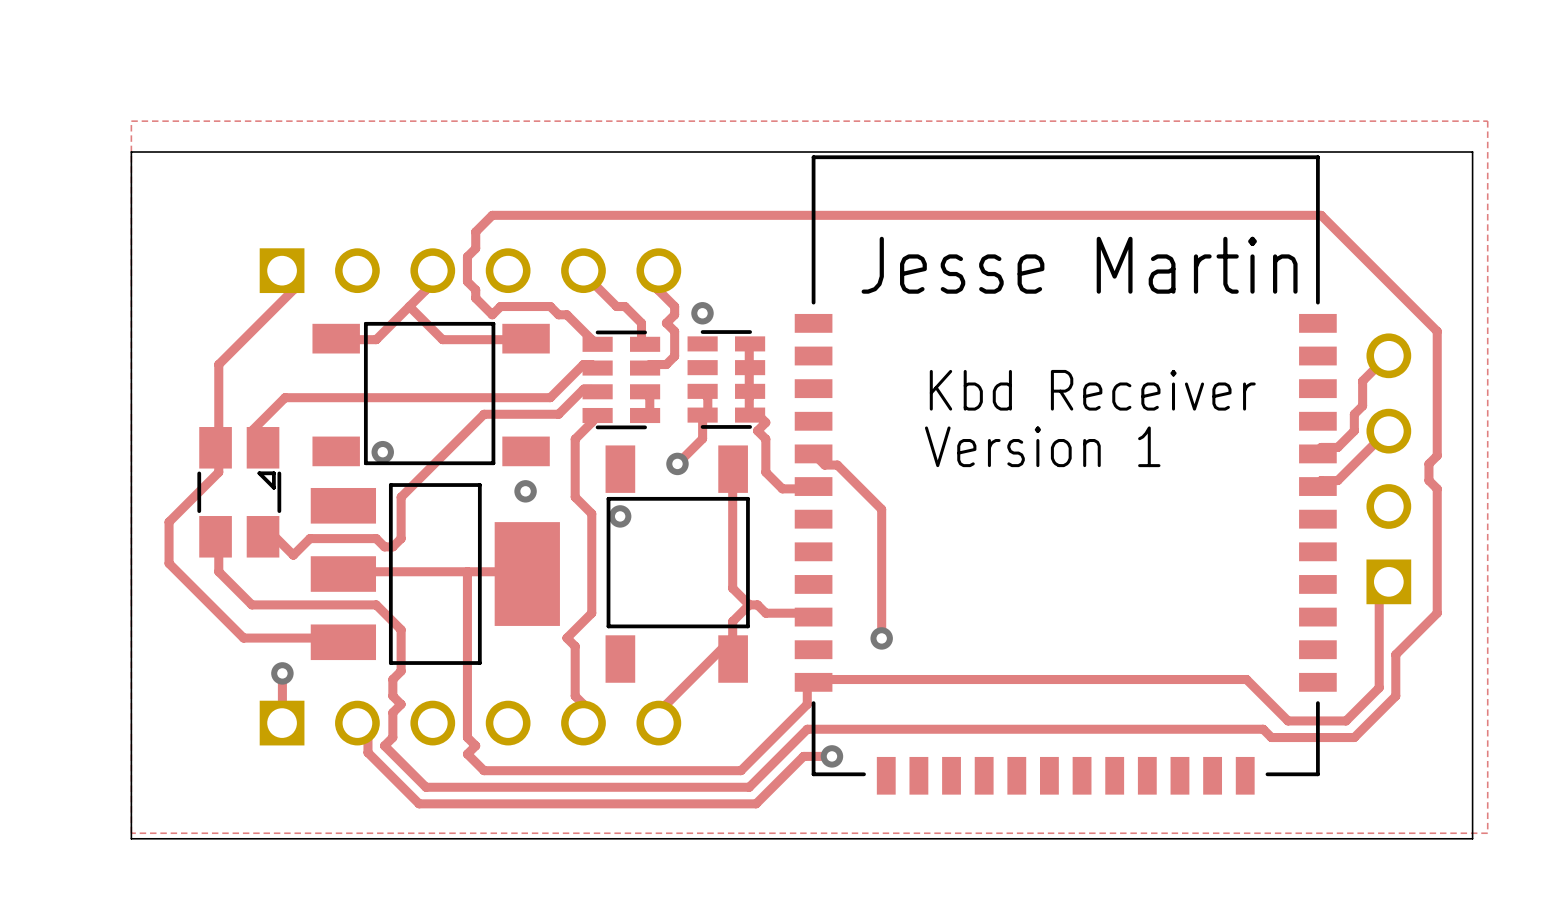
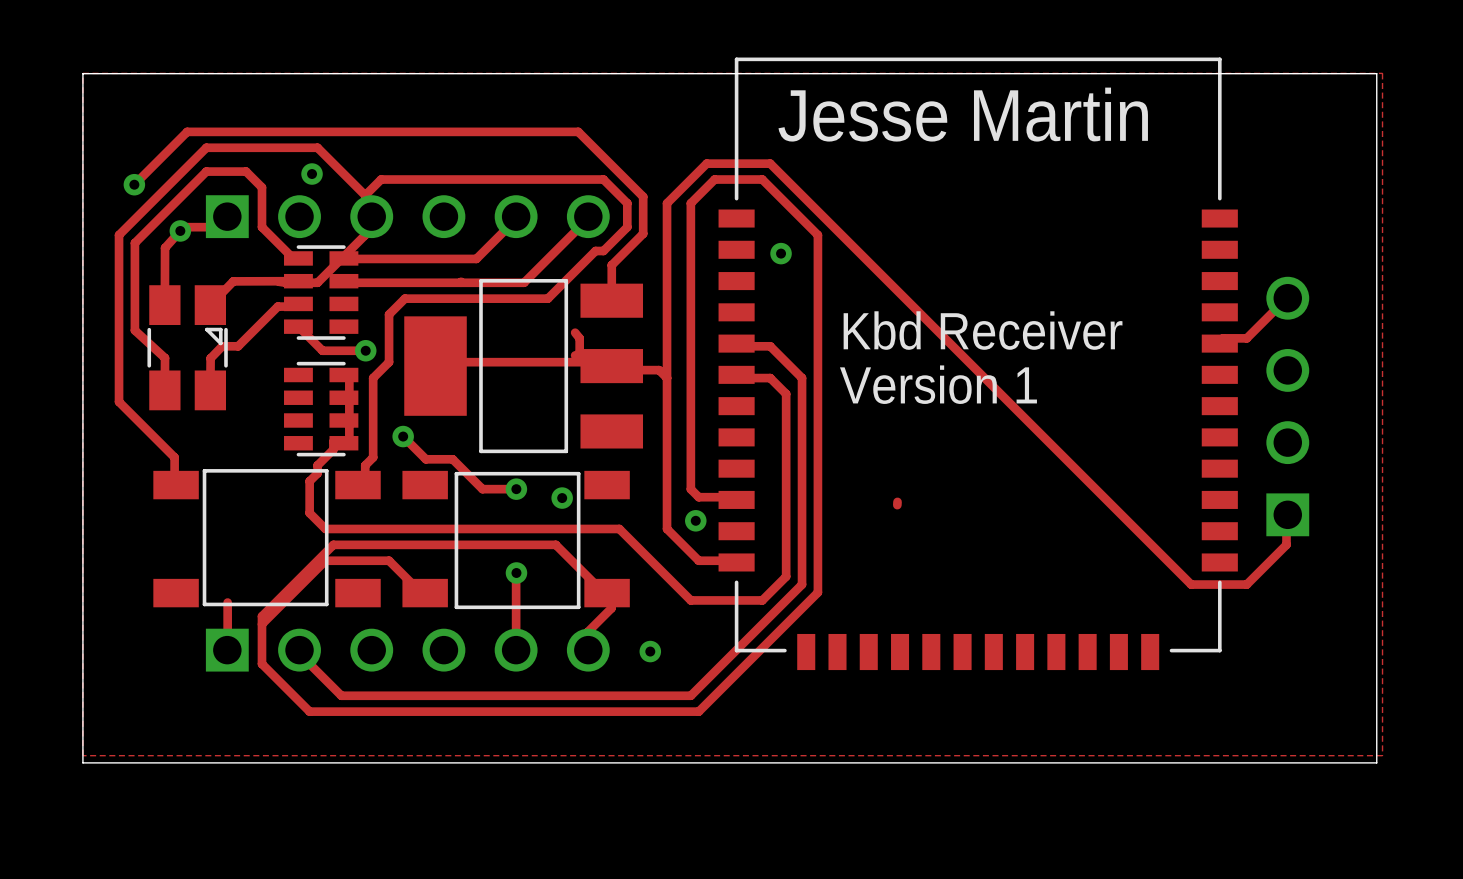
board edge: (131, 152) (1472, 152) (1472, 838) (131, 838) -> (82, 102) (82, 73) (1376, 73) (1376, 762) (82, 762) (82, 760)
track: (782, 215) (492, 215) (475, 231) (475, 248) (467, 256) (467, 281) (475, 289) (475, 298) (492, 314) (500, 306) (550, 306) (558, 314) (566, 314) (597, 344) -> none
track: (848, 215) (1321, 215) (1437, 331) (1437, 455) (1428, 464) (1428, 480) (1437, 488) (1437, 613) (1395, 654) (1395, 696) (1354, 737) (1271, 737) (1263, 729) (807, 729) -> (736, 343) (738, 346) (770, 346) (802, 378) (802, 584) (730, 656)
track: none -> (770, 163) (1191, 584) (1246, 584) (1286, 544) (1286, 513) (1288, 510)
via: none -> (312, 174)
track: none -> (134, 184) (187, 131) (578, 131) (643, 196) (643, 233) (611, 265) (611, 300)
via: none -> (134, 184)
text position: Jesse Martin (1079, 265) -> Jesse Martin (963, 114)
track: (282, 270) (293, 281) (293, 289) (218, 364) (218, 447) (215, 447) (218, 455) (218, 472) (169, 522) (169, 563) (243, 638) (343, 638) (343, 642) -> (227, 216) (214, 227) (182, 227) (165, 247) (164, 305)
track: (583, 273) (616, 306) (624, 306) (641, 323) (641, 339) (645, 344) -> (516, 219) (476, 258) (343, 258)
track: (658, 273) (658, 289) (674, 306) (674, 314) (666, 323) (674, 331) (674, 356) (666, 364) (649, 364) (645, 368) -> (587, 219) (524, 282) (460, 282)
via: none -> (180, 230)
track: (409, 306) (442, 339) -> (343, 281) (381, 282)
via: none -> (781, 253)
via: (702, 313) -> none
track: none -> (298, 258) (293, 258) (261, 227) (261, 187) (246, 171) (206, 171) (134, 243) (134, 330) (165, 358) (164, 390)
track: none -> (293, 282) (298, 281) (233, 281) (210, 305)
track: (750, 343) (749, 414) (757, 414) (765, 422) (757, 430) (765, 439) -> (674, 711) (698, 711) (817, 592) (817, 235) (762, 179) (714, 179) (690, 203) (690, 378)
part: none -> (321, 292)
track: none -> (298, 303) (293, 306) (277, 306) (238, 346) (222, 346) (210, 358) (210, 390)
track: (597, 368) (591, 364) (583, 364) (550, 397) (285, 397) (251, 430) (251, 439) (263, 447) -> none
part: (621, 379) -> none
part: (726, 379) -> none
track: (1362, 381) (1362, 405) (1354, 414) (1354, 430) (1337, 447) (1321, 447) (1317, 453) -> (1262, 322) (1246, 338) (1222, 338) (1219, 343)
track: none -> (298, 326) (322, 350) (365, 350)
track: (597, 391) (583, 389) (558, 414) (484, 414) (401, 497) (401, 538) (392, 546) (384, 546) (376, 538) (309, 538) (293, 555) (268, 530) (263, 536) -> none
track: (702, 391) (707, 397) (707, 414) (702, 415) (702, 438) (677, 463) -> none
part: (431, 394) -> none
via: none -> (365, 350)
track: (597, 415) (575, 439) (575, 497) (591, 513) (591, 613) (566, 638) (575, 646) (575, 696) (583, 704) -> (516, 573) (516, 632)
track: none -> (435, 366) (436, 362) (611, 362) (611, 366) (619, 370) (659, 370) (667, 378)
track: (1388, 431) (1337, 480) (1321, 480) (1317, 486) -> none
track: none -> (343, 375) (349, 378) (349, 393) (343, 397) (349, 401) (349, 417) (343, 420) (349, 425) (349, 441) (343, 443) (333, 441) (333, 449) (317, 465) (317, 473) (309, 481) (309, 513) (325, 528) (619, 528) (690, 600) (762, 600) (786, 576) (786, 393) (770, 378) (738, 378) (736, 374)
via: (382, 452) -> none
track: (813, 453) (824, 465) (837, 465) (881, 509) (881, 638) -> none
via: (677, 463) -> none
track: (733, 469) (732, 588) (740, 596) -> (706, 163) (667, 203) (667, 528)
part: none -> (321, 409)
track: (765, 472) (782, 488) (807, 488) (813, 486) -> (690, 409) (690, 489) (698, 497) (730, 497) (736, 499)
part position: (1065, 474) -> (978, 363)
via: (525, 491) -> none
part position: (239, 492) -> (187, 347)
track: none -> (403, 436) (425, 459) (452, 459) (482, 489) (516, 489)
via: none -> (403, 436)
via: (620, 516) -> none
track: (215, 536) (218, 538) (218, 571) (251, 604) (376, 604) (401, 629) (401, 671) (392, 679) (392, 696) (401, 704) (392, 712) (392, 737) (384, 745) (425, 787) -> none
track: none -> (176, 485) (174, 457) (119, 401) (119, 235) (206, 147) (317, 147) (365, 195) (381, 179) (603, 179) (627, 203) (627, 227) (603, 251) (595, 251) (547, 298) (404, 298) (389, 314) (389, 362) (373, 378) (373, 457) (365, 465) (365, 481) (358, 485)
via: none -> (516, 489)
via: none -> (562, 498)
part rotation: 0° (677, 564) -> 90° clockwise (516, 539)
track: none -> (897, 501) (897, 505)
track: (467, 571) (467, 737) (475, 745) (467, 754) (484, 770) -> (299, 650) (301, 656) (341, 695) (420, 695)
track: (343, 574) (351, 571) (525, 571) (527, 574) -> none
part rotation: 0° (435, 574) -> 180° (523, 366)
part position: (435, 574) -> (523, 366)
track: (1388, 581) (1387, 588) (1379, 596) (1379, 687) (1346, 720) (1288, 720) (1246, 679) (815, 679) (807, 687) (807, 704) (740, 770) -> none
via: none -> (695, 520)
track: none -> (674, 536) (698, 560) (736, 562)
part: none -> (267, 538)
track: (813, 617) (807, 613) (765, 613) (757, 604) (749, 604) (732, 621) (733, 659) (732, 638) (666, 704) (666, 720) (658, 723) -> (365, 711) (309, 711) (261, 663) (261, 616) (333, 544) (555, 544) (603, 592) (607, 593) (611, 600) (611, 608) (587, 632) (588, 650)
via: (881, 638) -> none
via: none -> (516, 572)
track: none -> (425, 593) (420, 592) (389, 560) (325, 560) (261, 624)
via: (282, 673) -> none
track: (357, 723) (367, 733) (367, 752) (419, 803) (756, 803) (803, 756) (831, 756) -> none
via: none -> (650, 651)
via: (831, 756) -> none
track: (765, 770) (749, 787) -> (690, 695) (667, 695)

